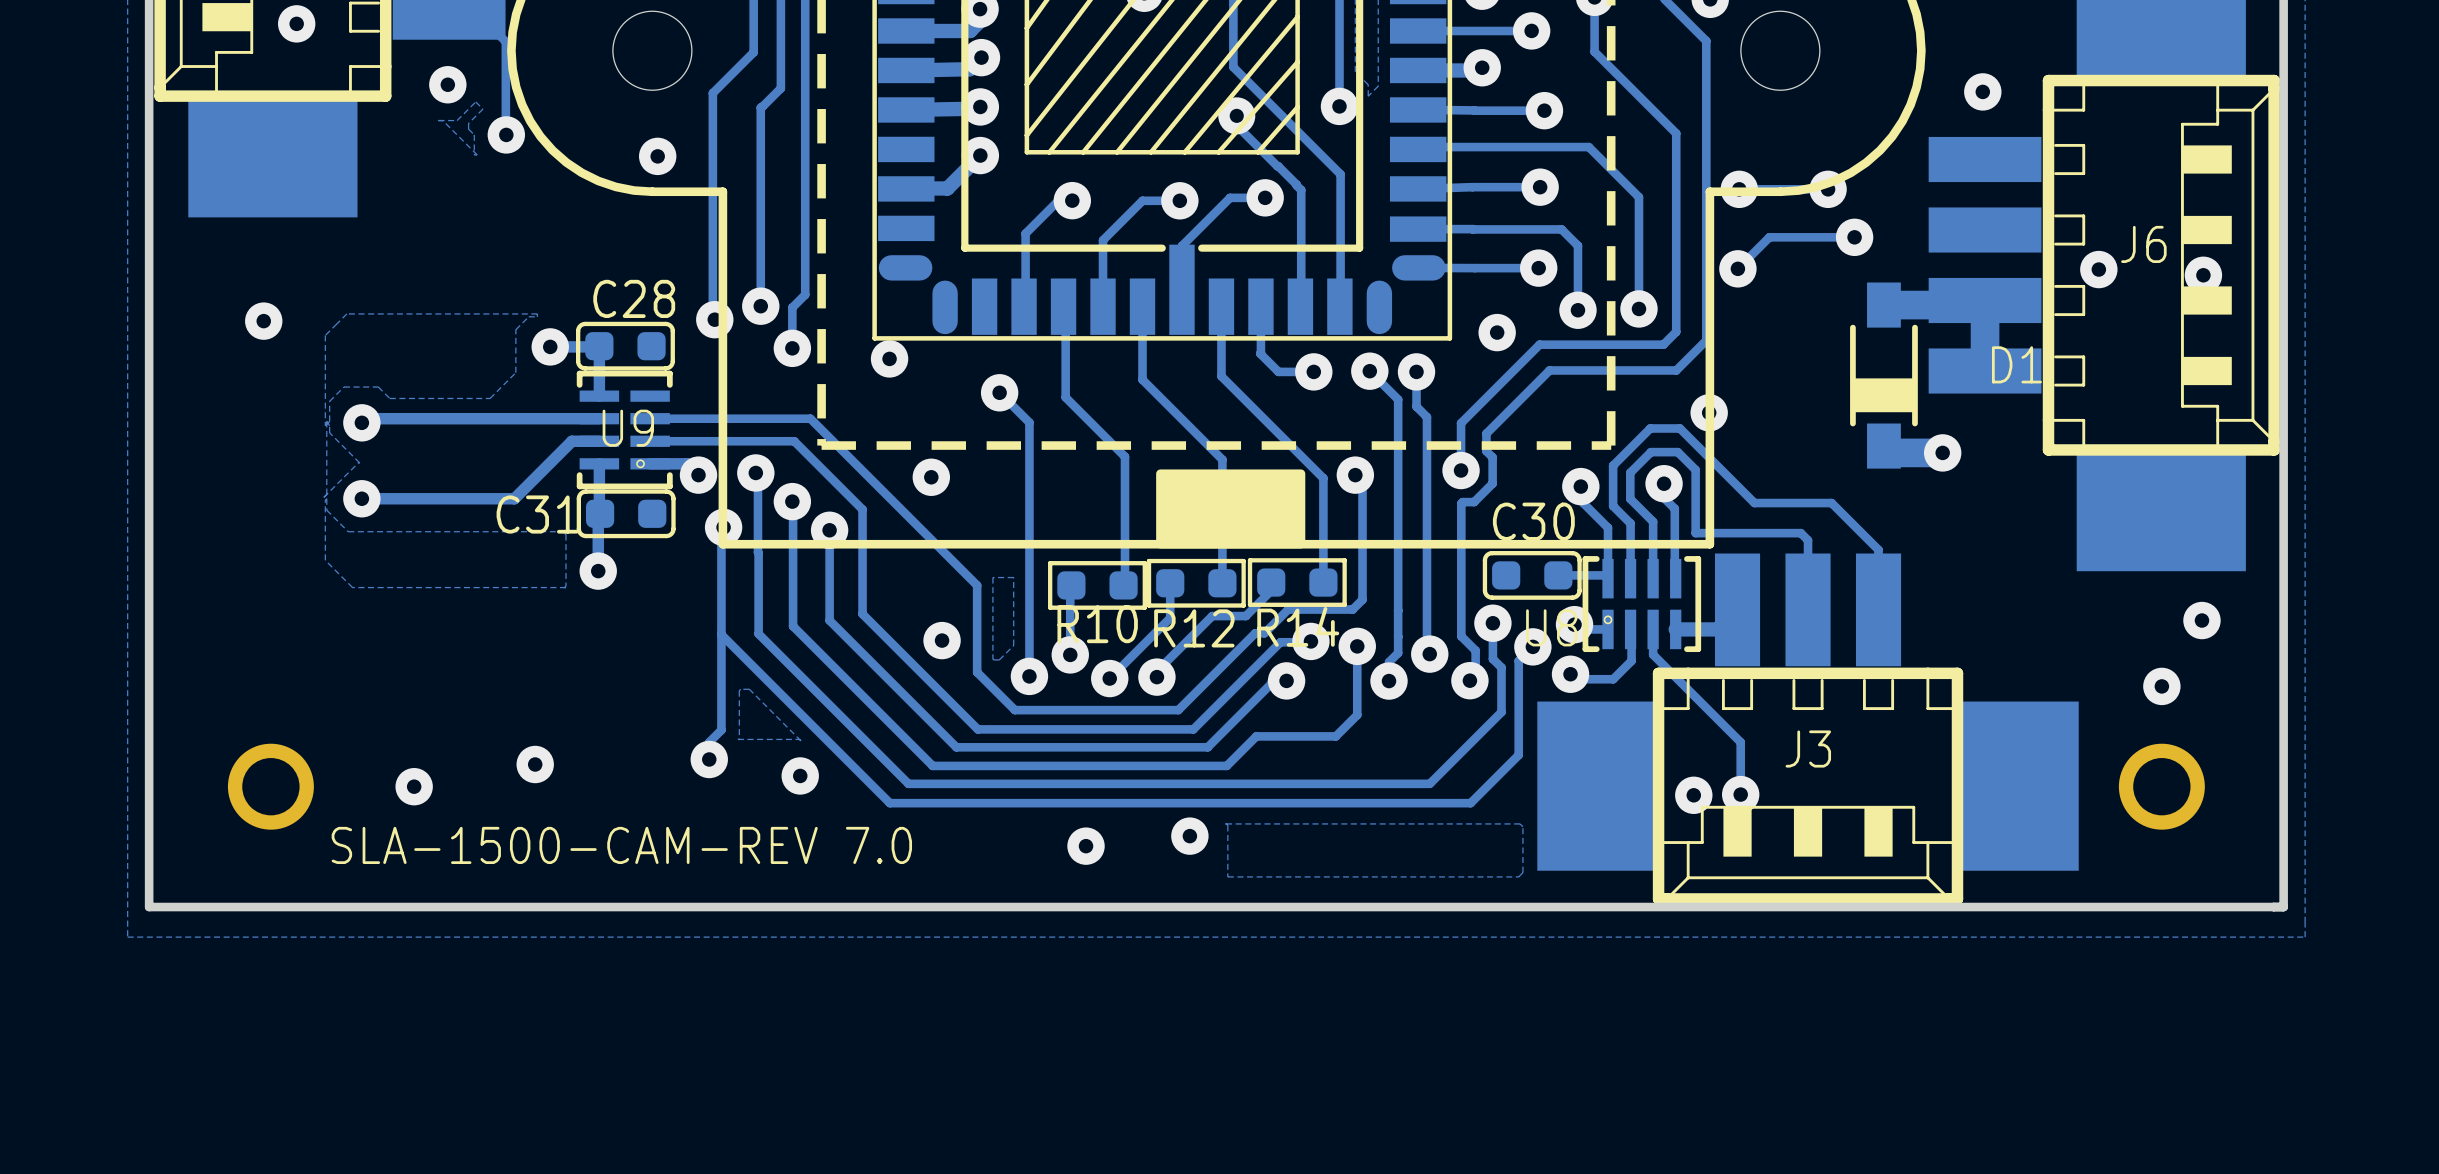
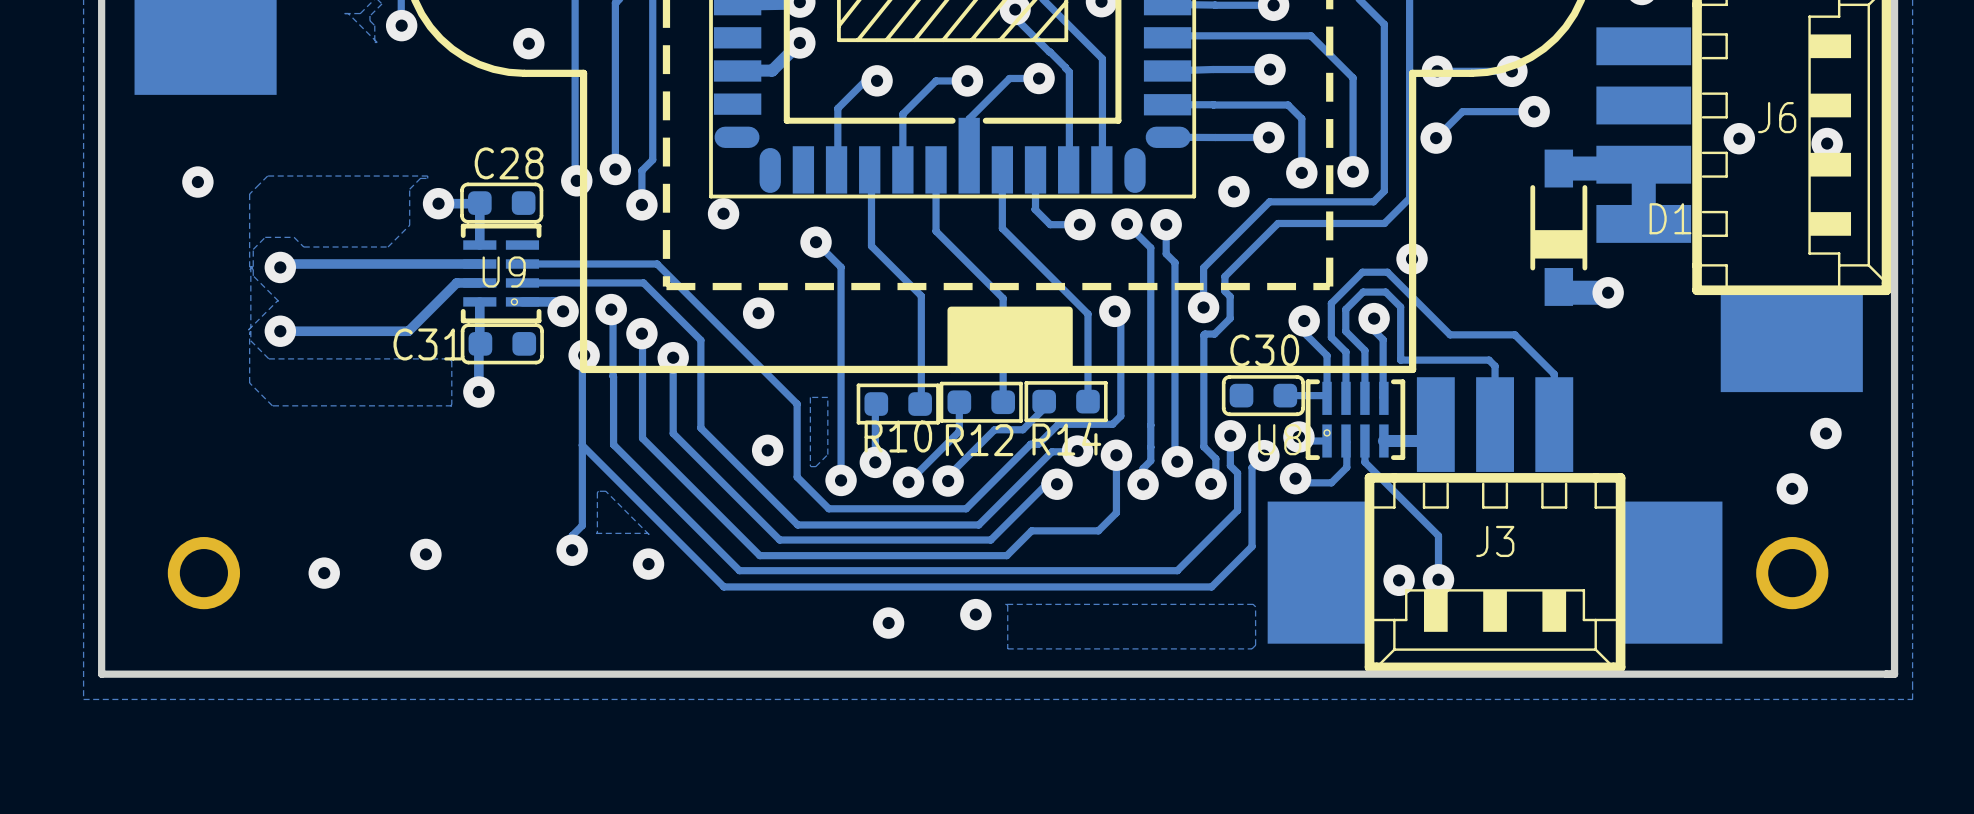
text: SLA-1500-CAM-REV 7.0 (621, 845) -> none

